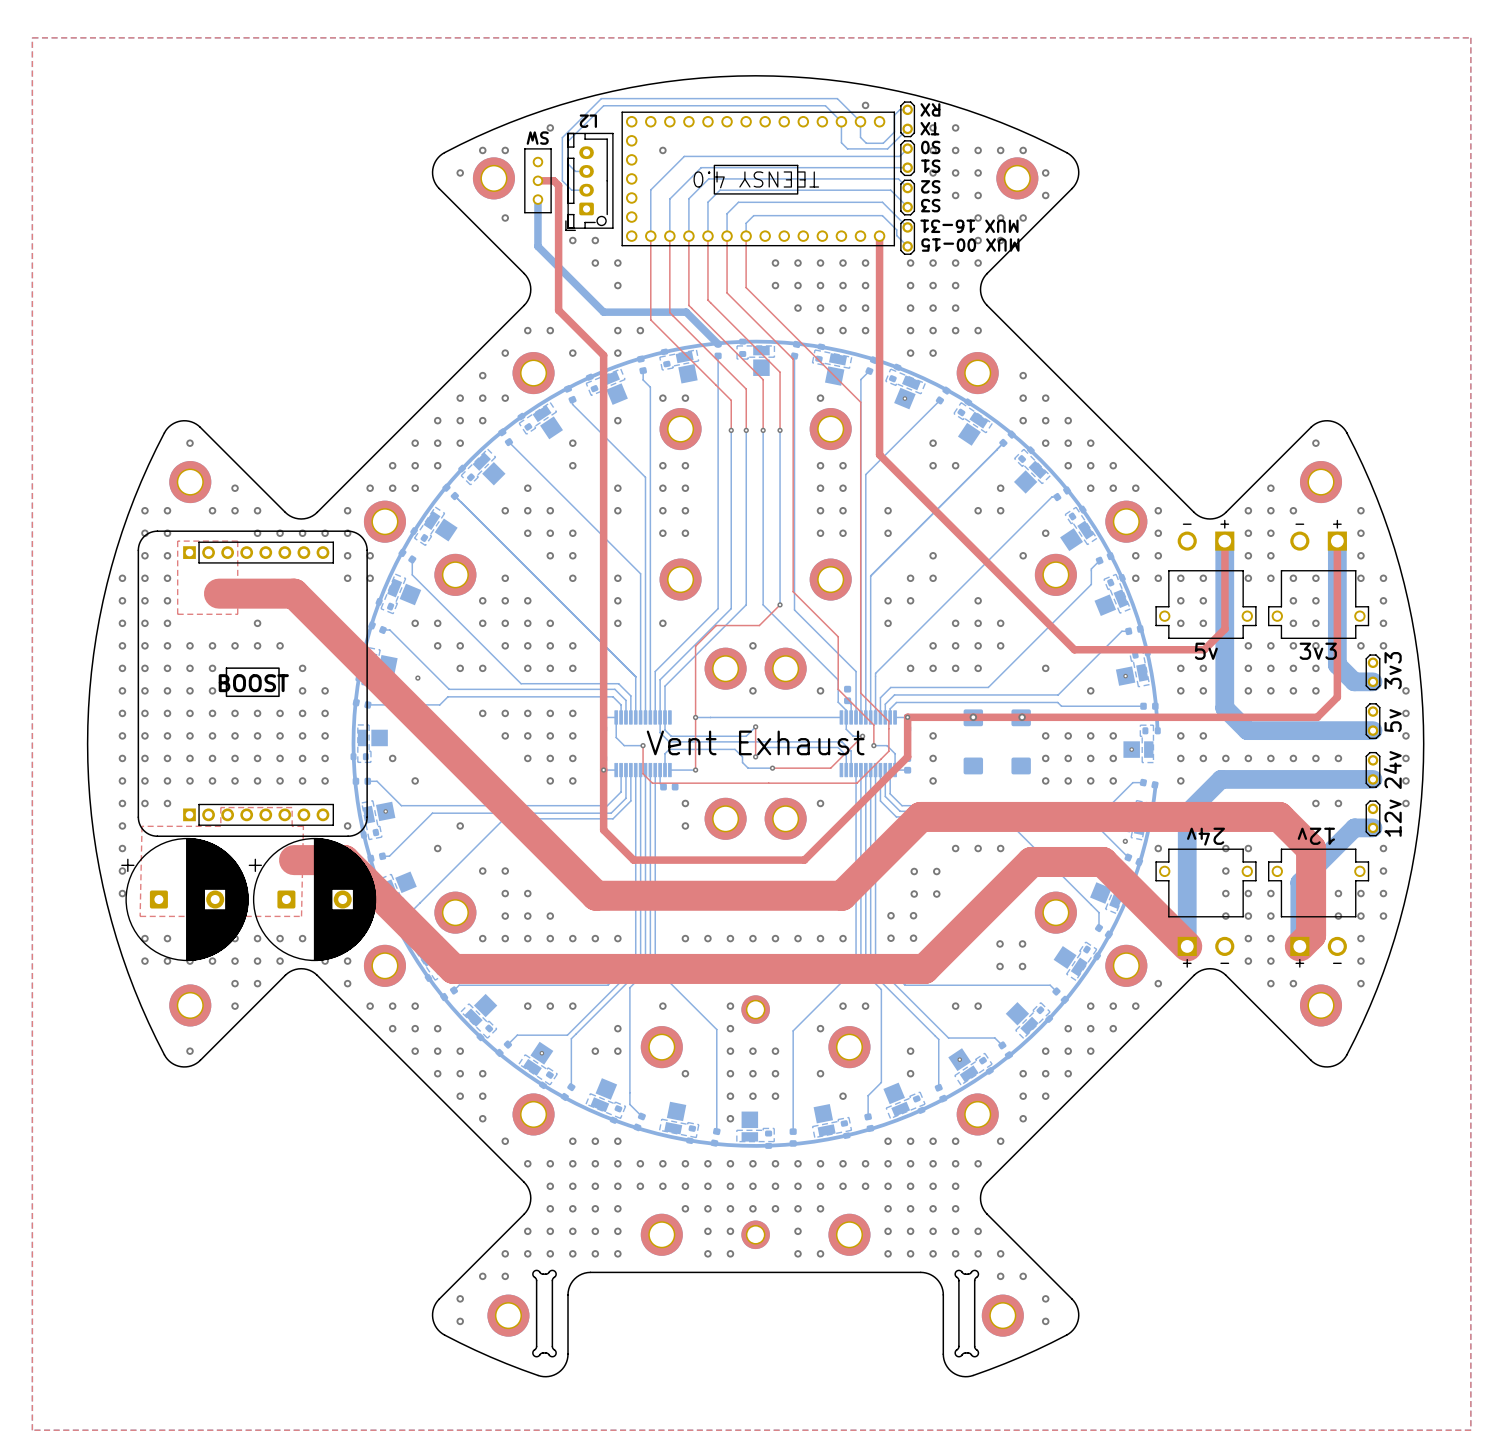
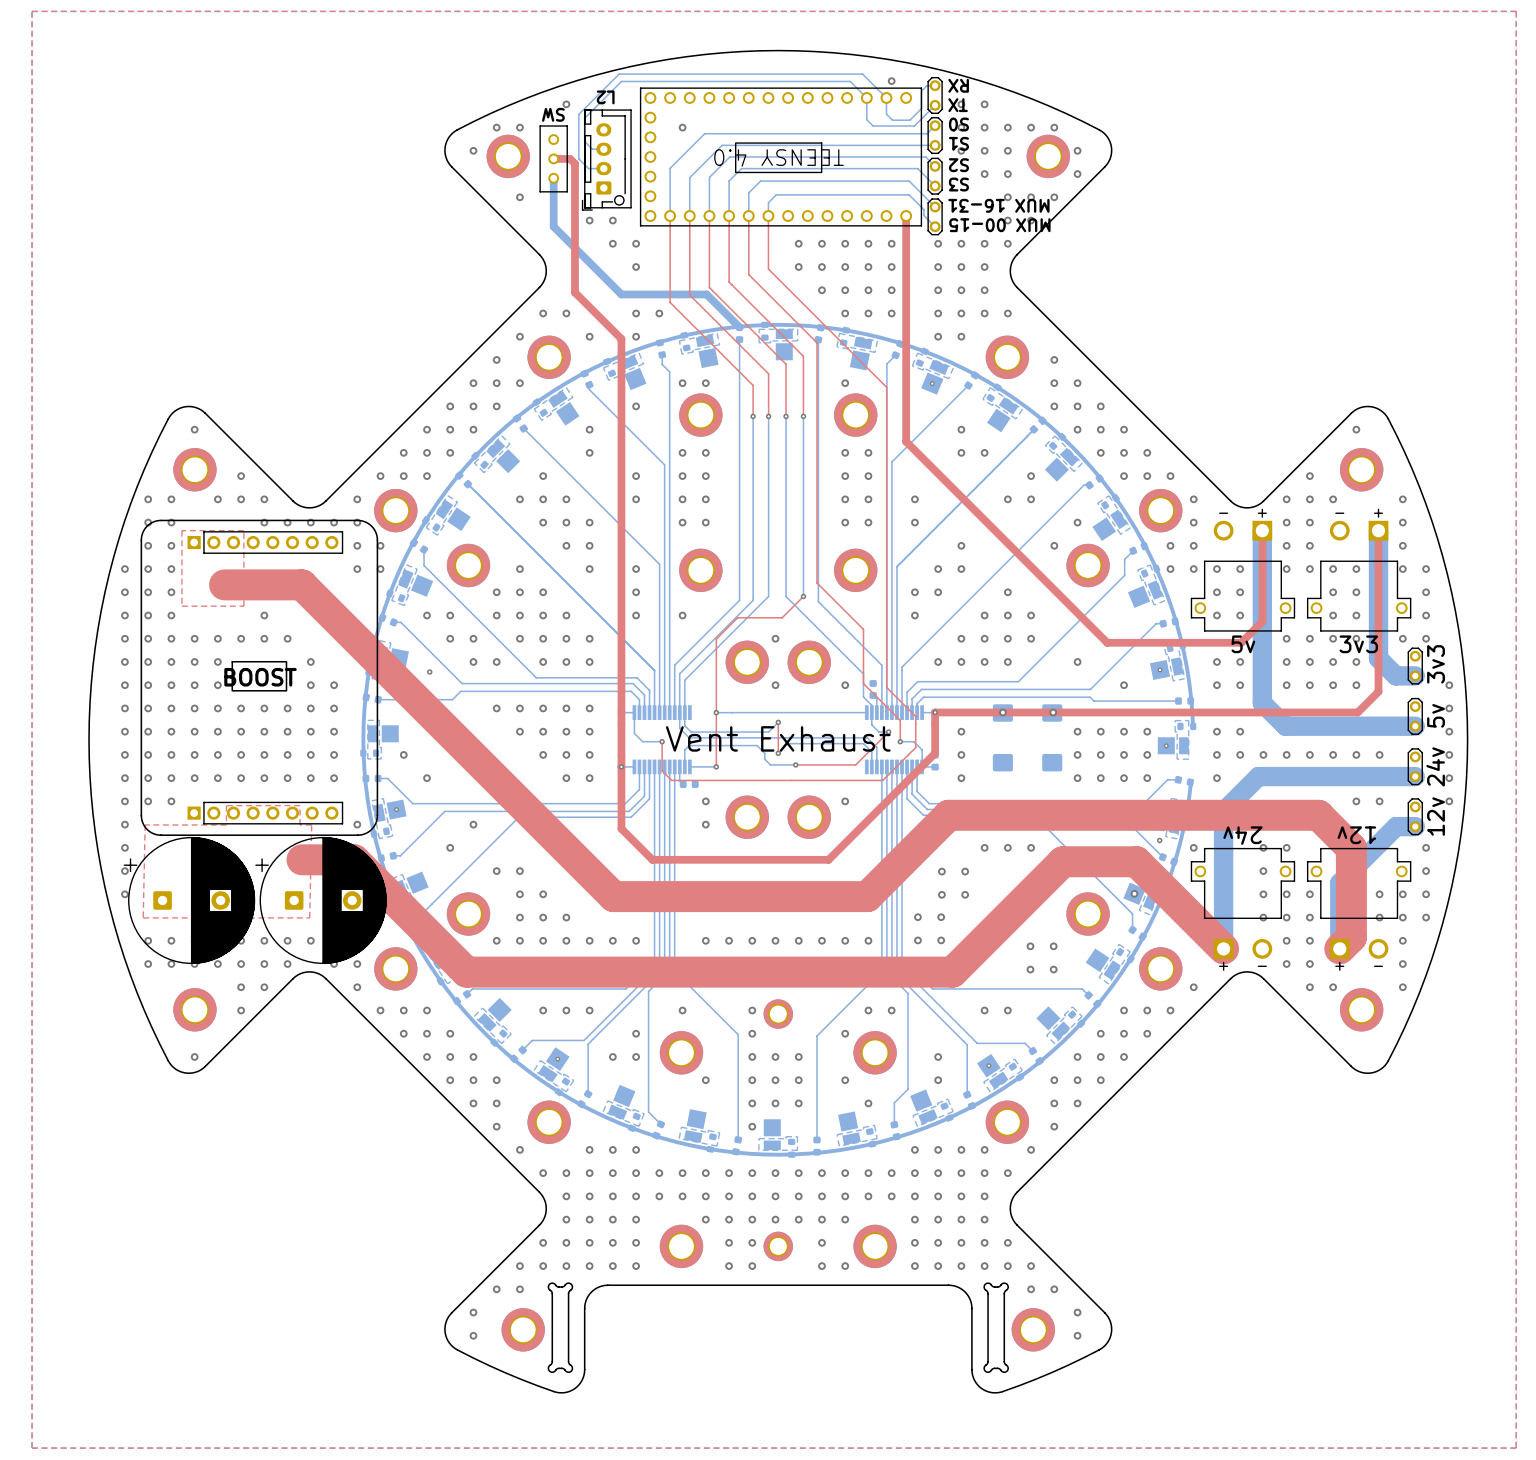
via: none -> (1134, 893)

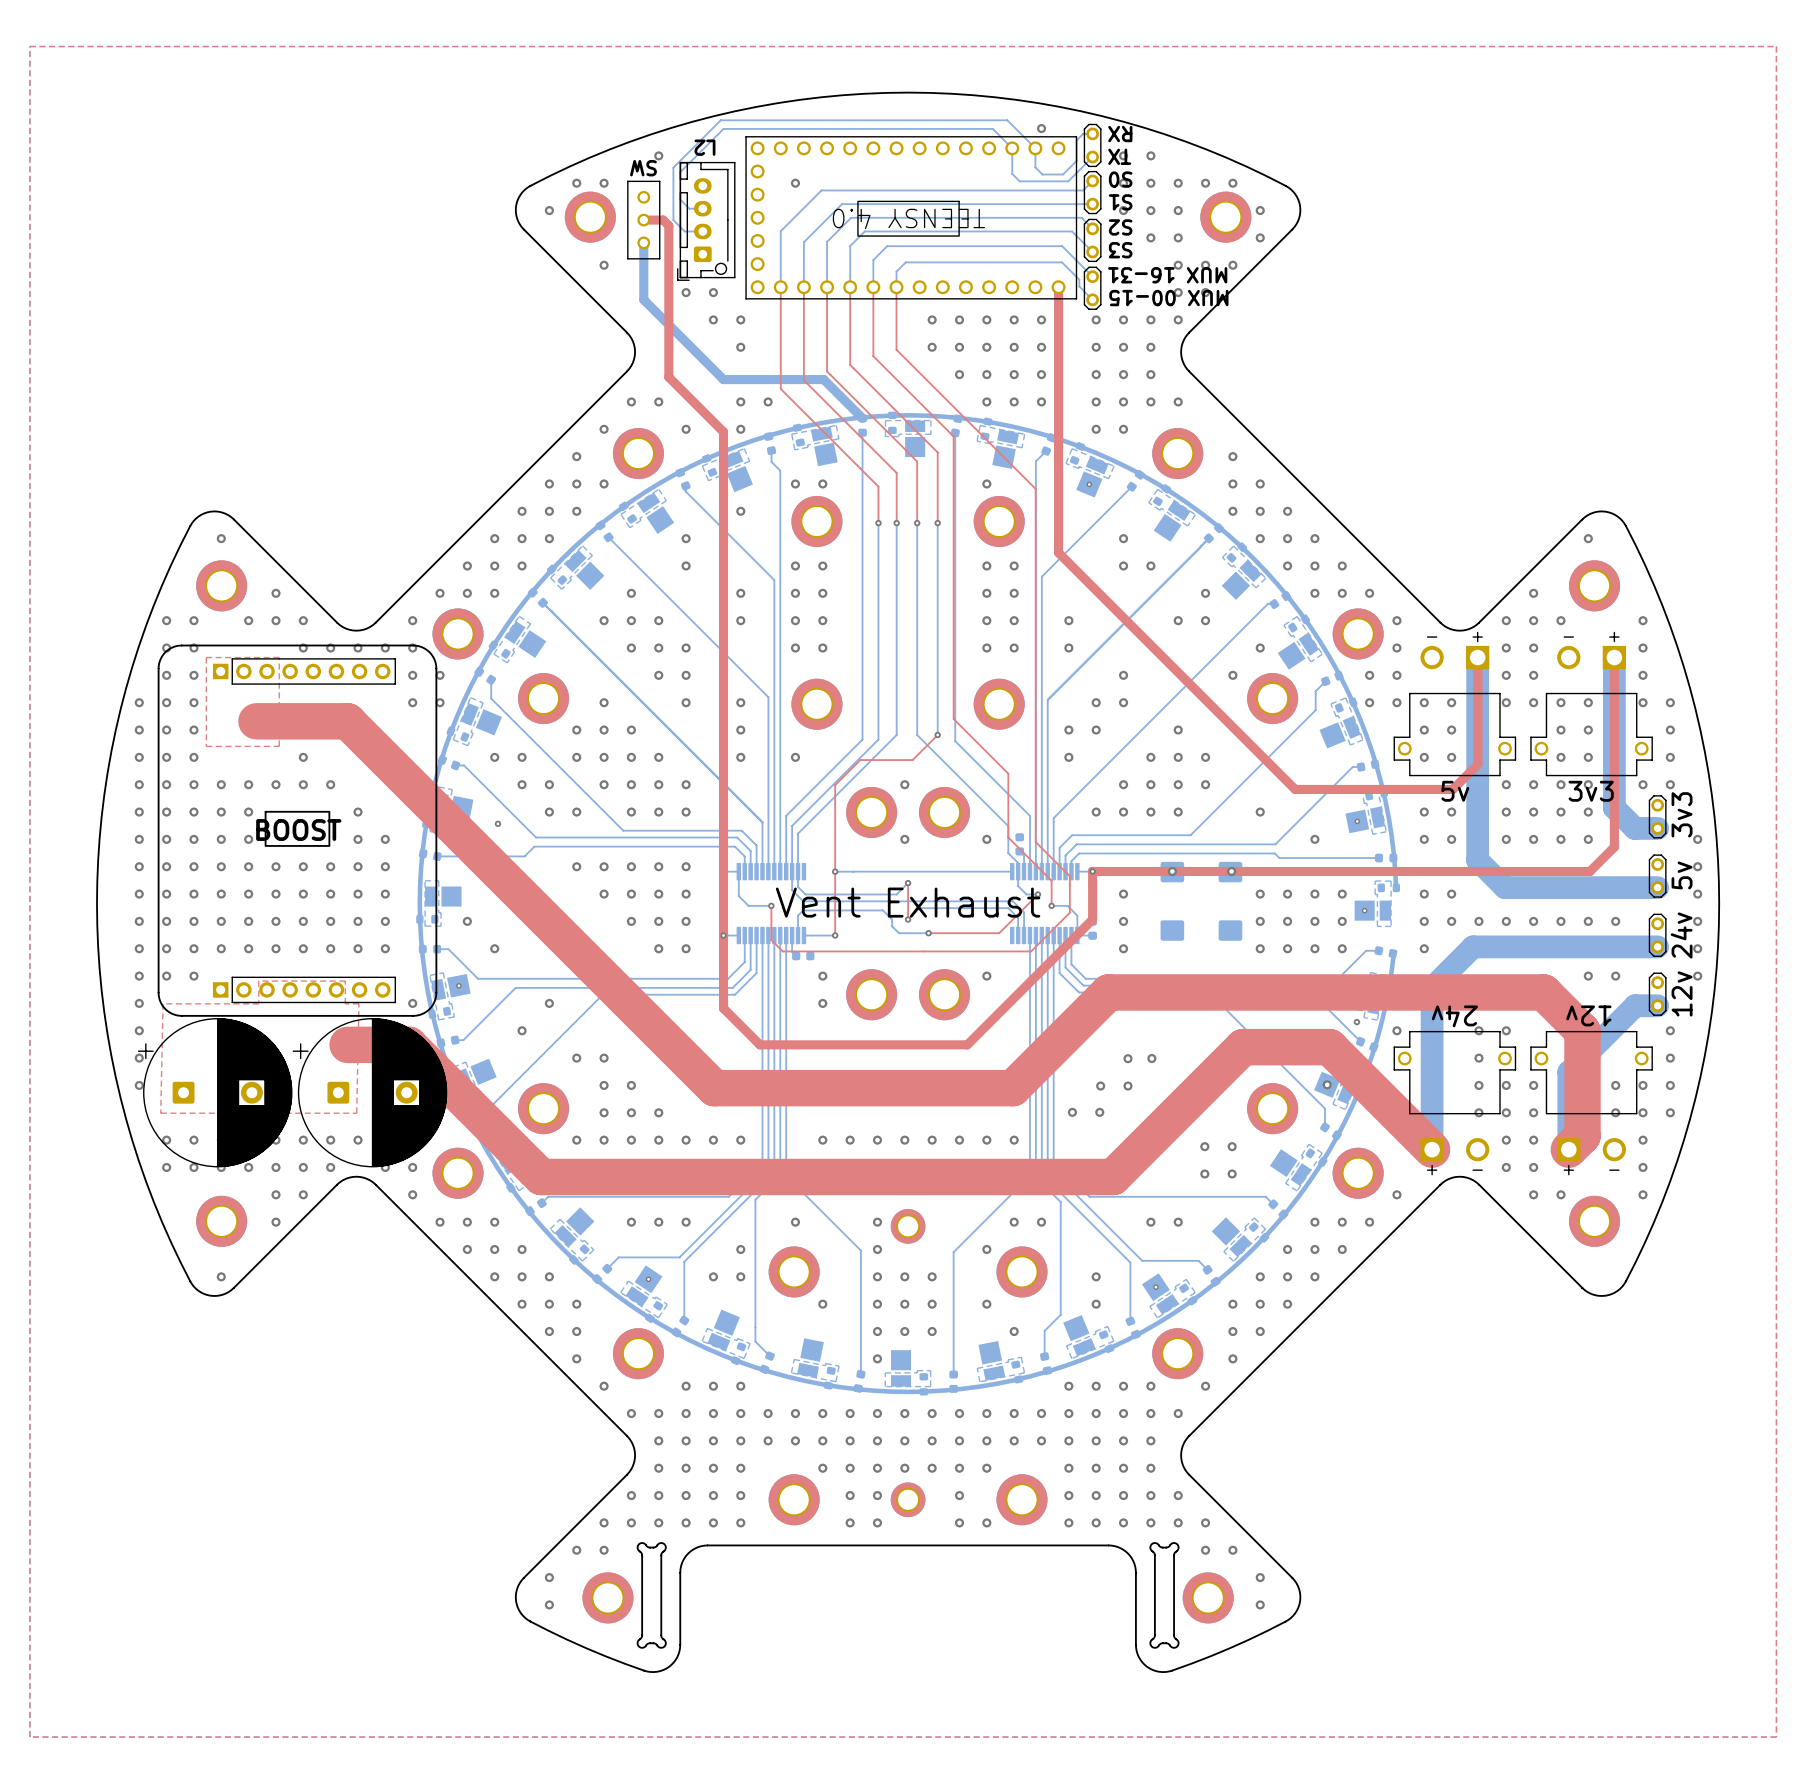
via: (984, 847) -> none
via: (1007, 847) -> none
via: (1031, 847) -> none
via: (941, 871) -> none
via: none -> (1151, 1058)
via: (917, 940) -> none
via: (941, 940) -> none

